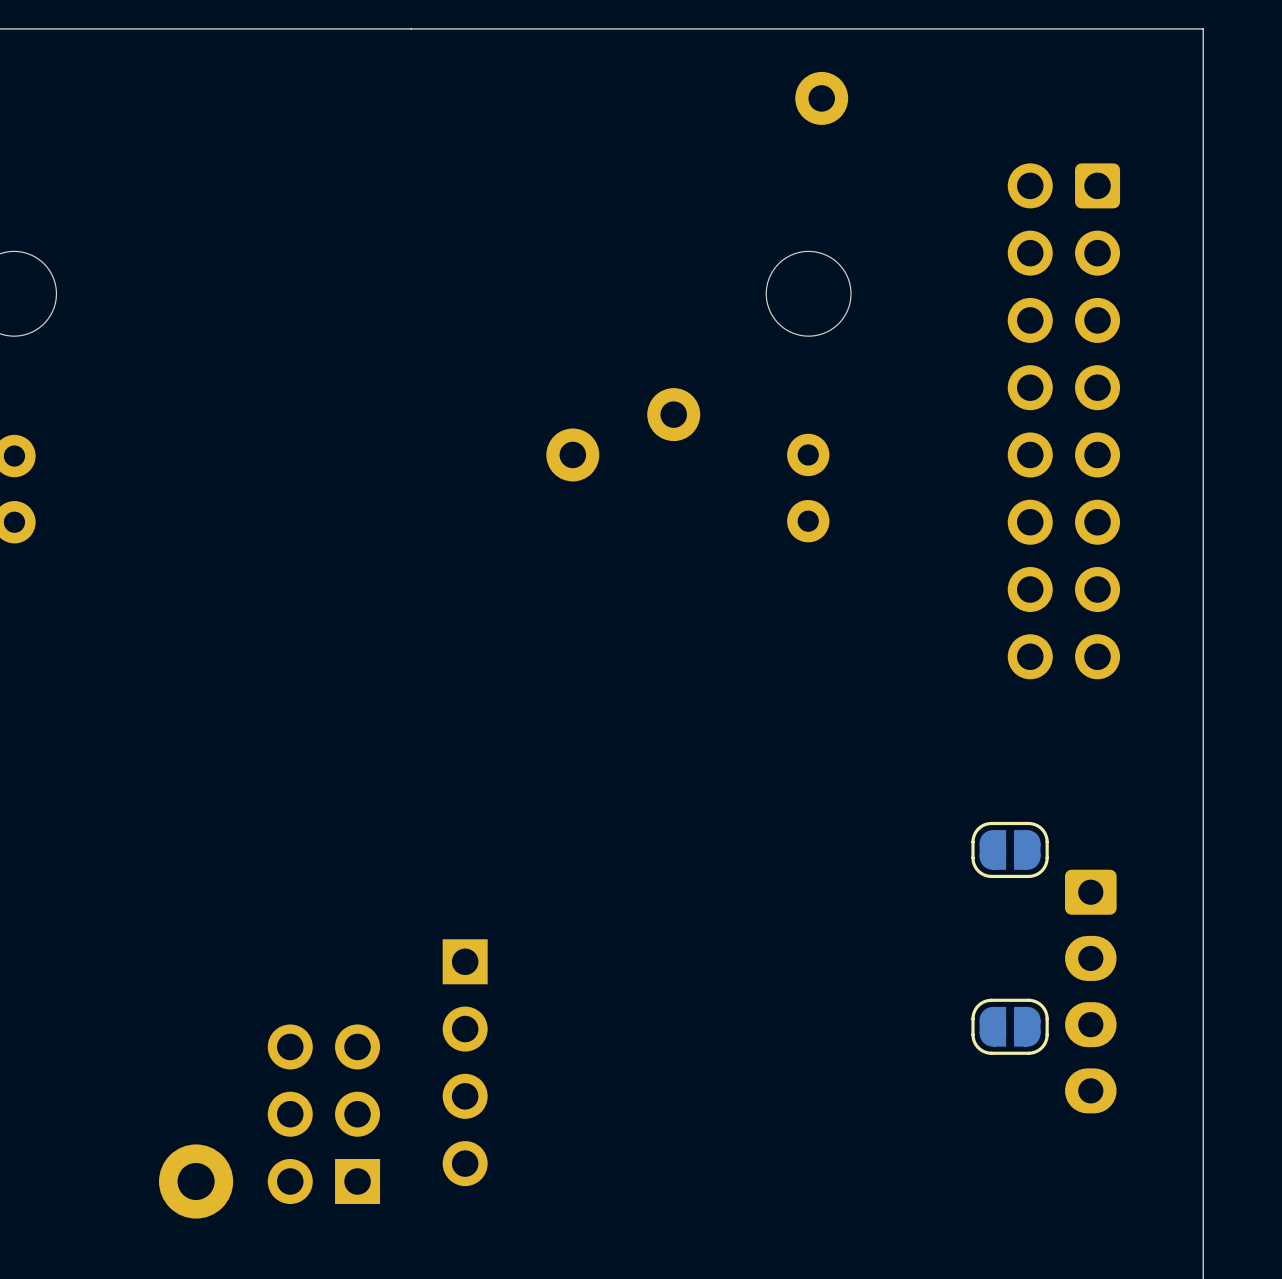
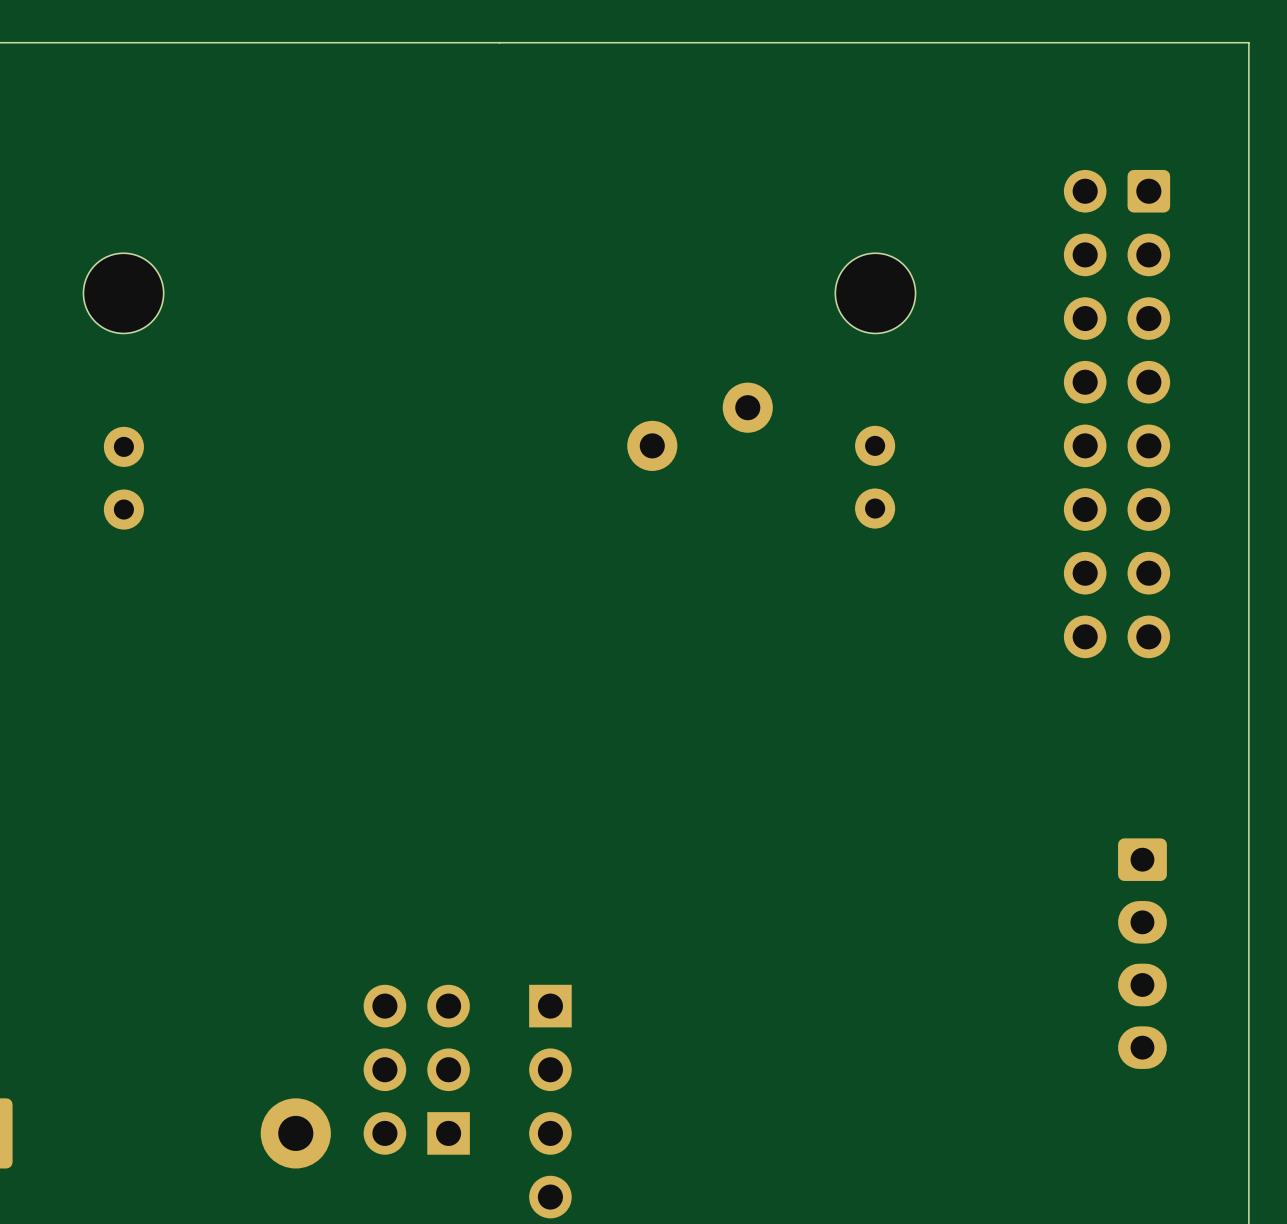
part: (821, 98) -> none
part: (1010, 849) -> none
part: (1010, 1026) -> none
part position: (465, 1062) -> (550, 1101)

